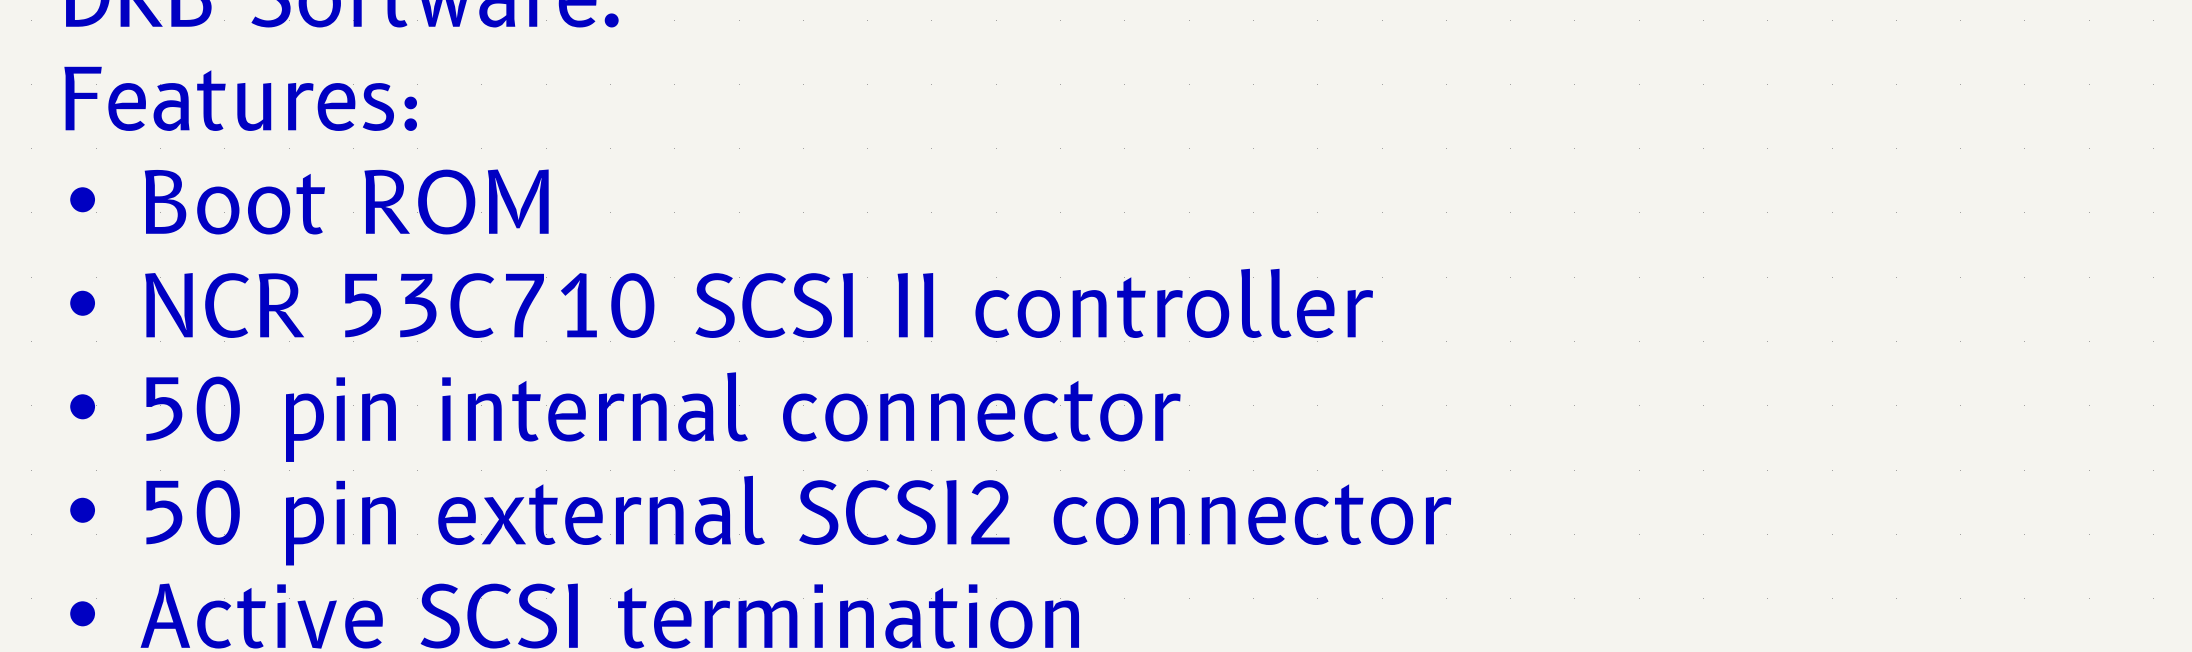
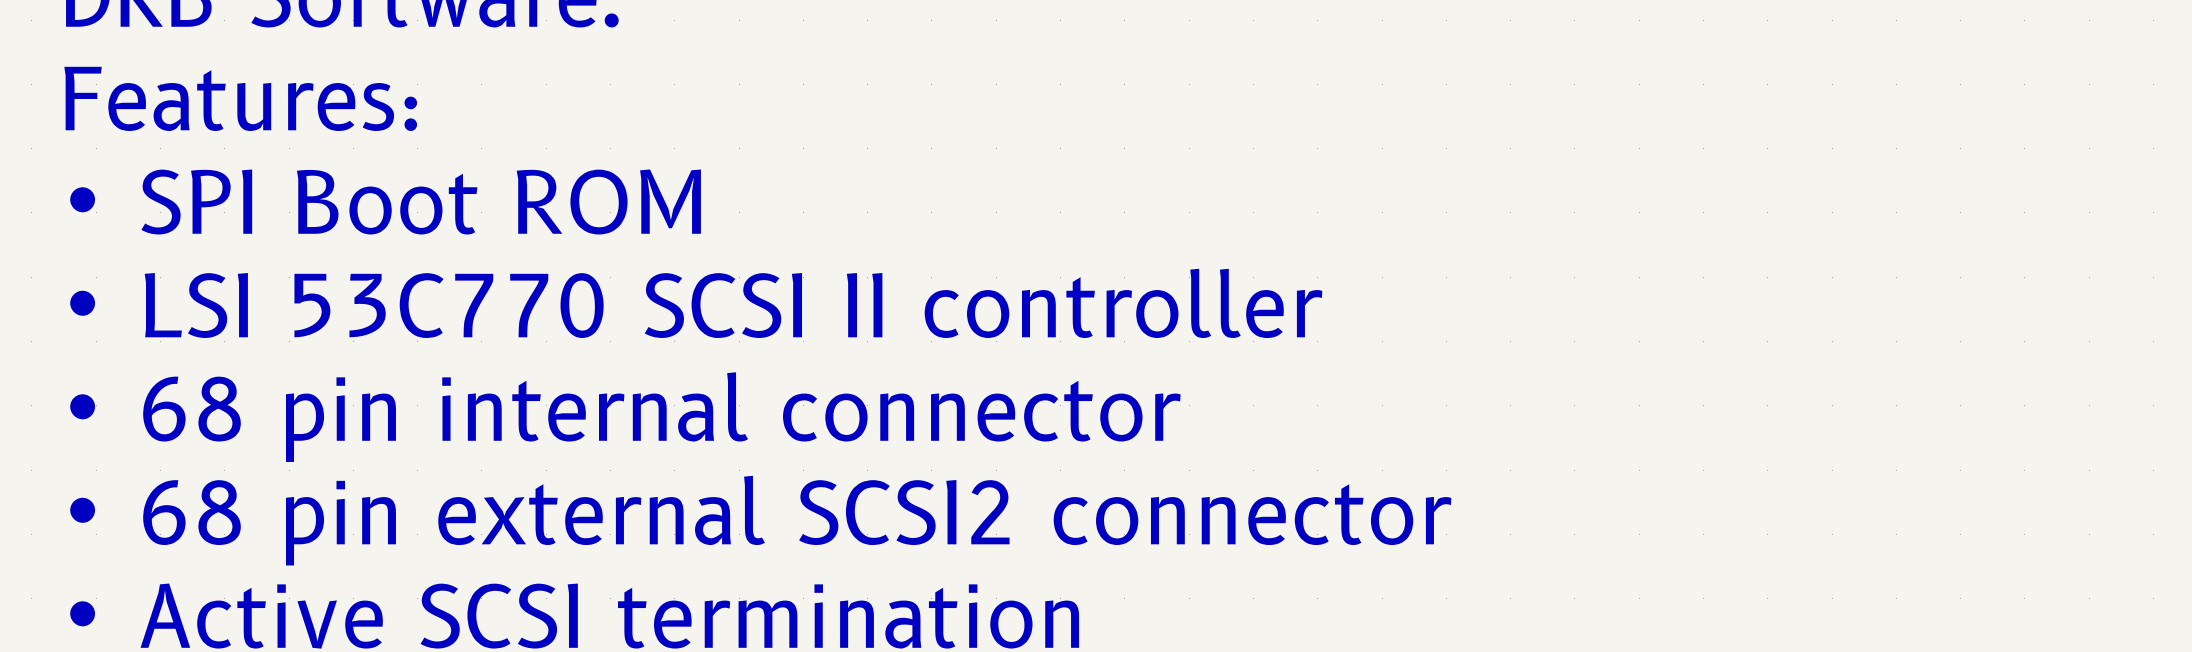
text: • Boot ROM (309, 201) -> • SPI Boot ROM (385, 201)
text: • NCR 53C710 SCSI II controller (721, 303) -> • LSI 53C770 SCSI II controller (696, 303)
text: • 50 pin internal connector (625, 417) -> • 68 pin internal connector (625, 417)
text: • 50 pin external SCSI2 connector (760, 520) -> • 68 pin external SCSI2 connector (760, 520)

